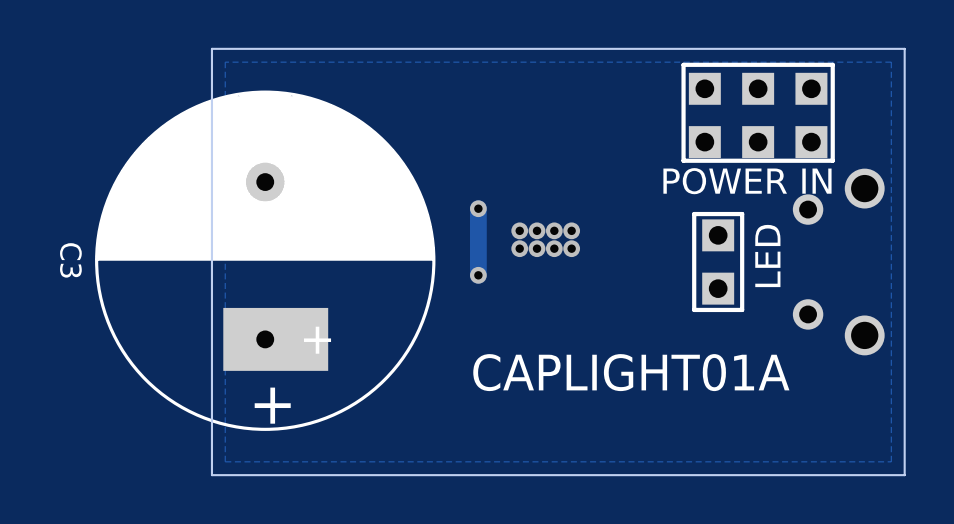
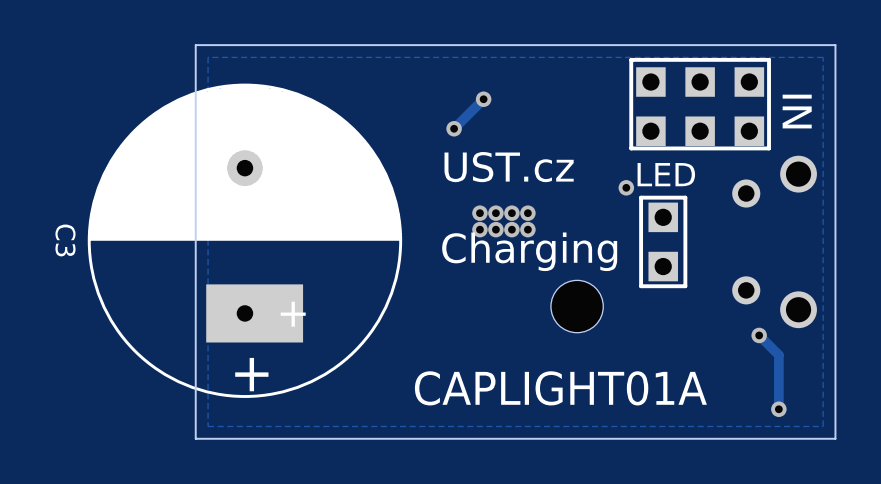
track: none -> (483, 99) (454, 128)
via: none -> (483, 99)
text: none -> IN (797, 111)
via: none -> (454, 128)
text: none -> UST.cz (509, 167)
text: POWER IN (747, 181) -> none
via: none -> (626, 187)
track: (478, 208) (478, 275) -> none
via: (478, 208) -> none
text rotation: 0° (767, 255) -> 90° clockwise (666, 174)
text: none -> Charging (529, 251)
via: (478, 275) -> none
part: none -> (577, 306)
track: none -> (759, 335) (778, 355) (778, 409)
via: none -> (759, 335)
text position: CAPLIGHT01A (631, 372) -> CAPLIGHT01A (560, 388)
via: none -> (778, 409)

